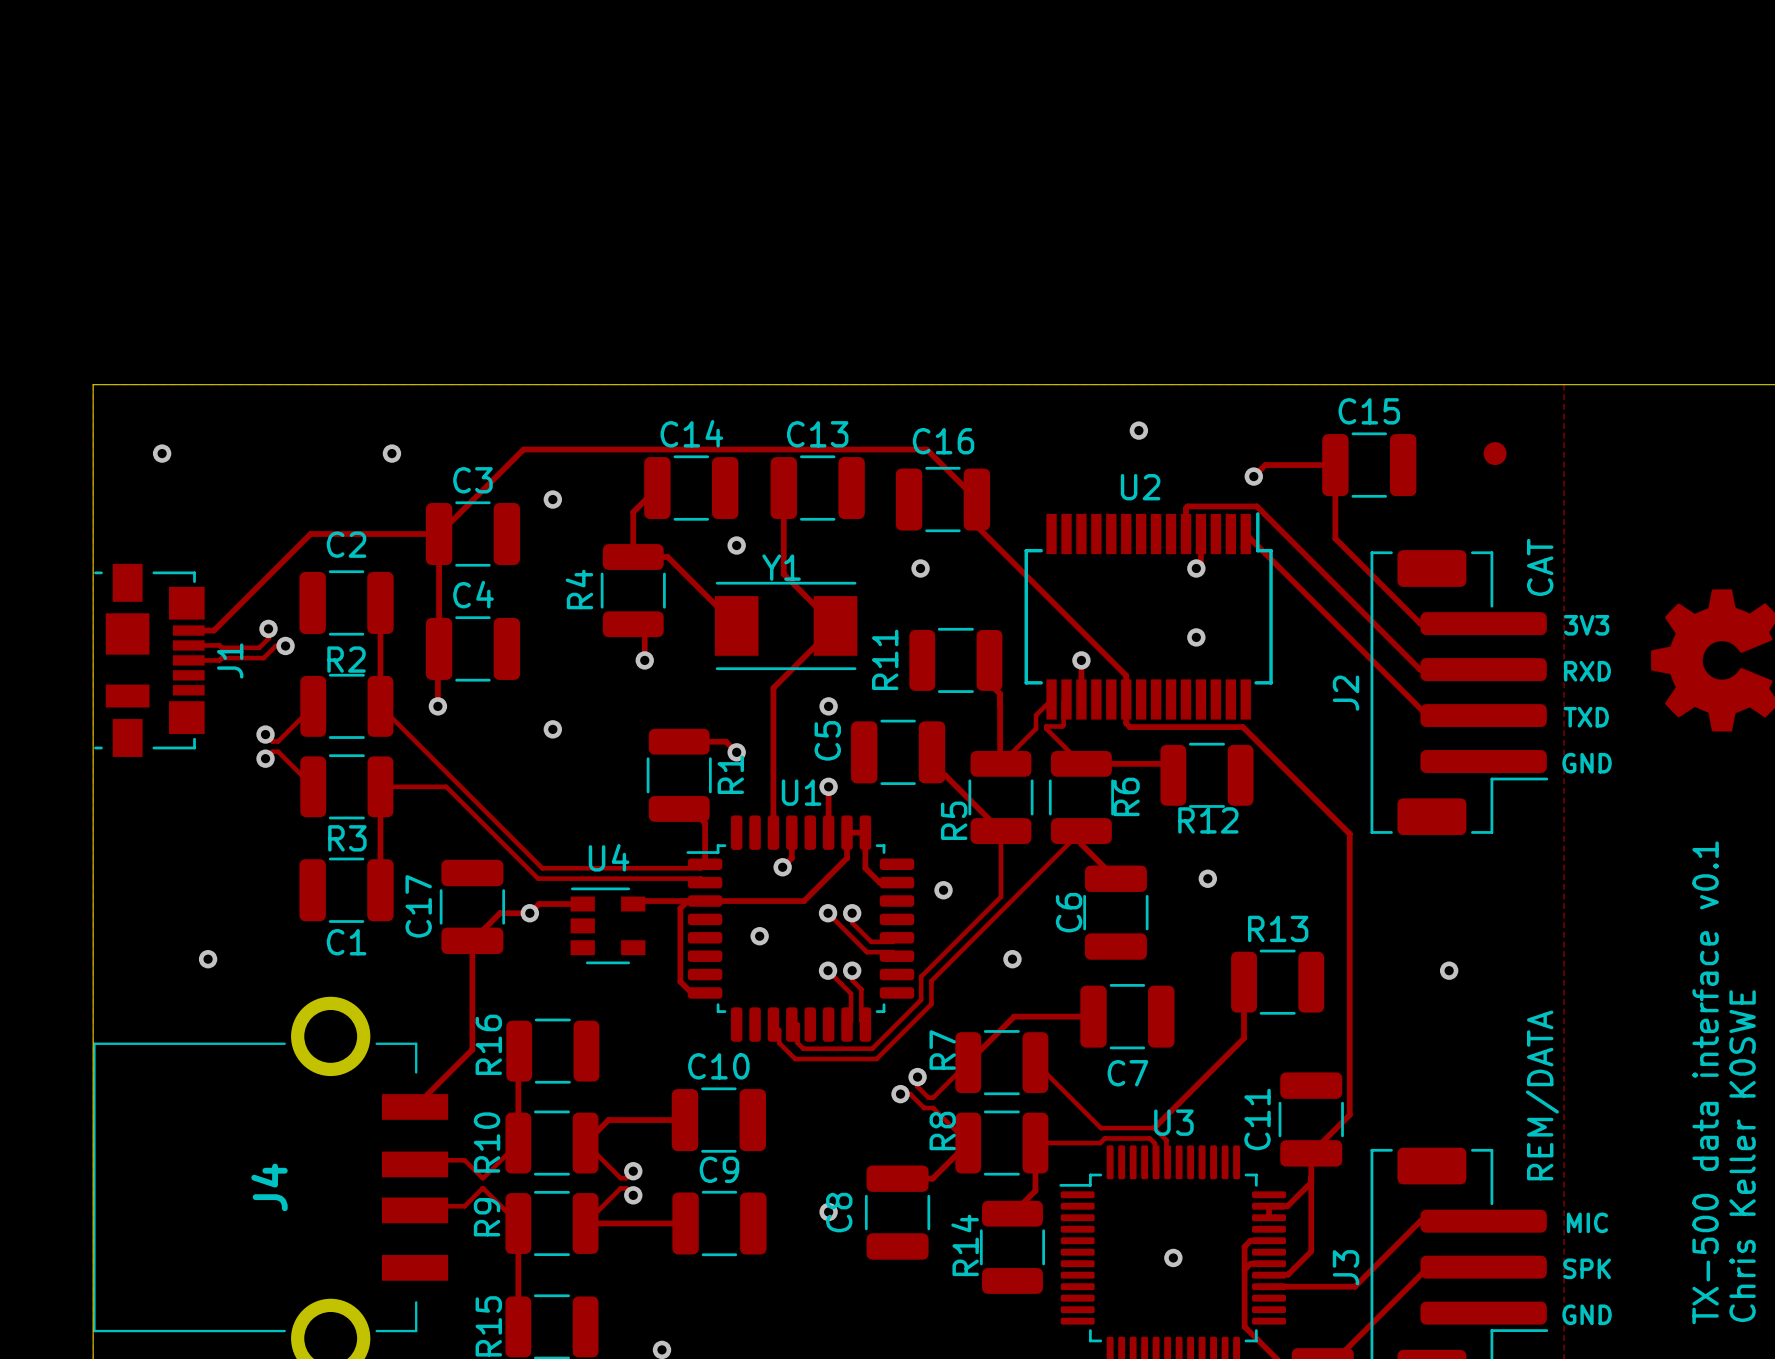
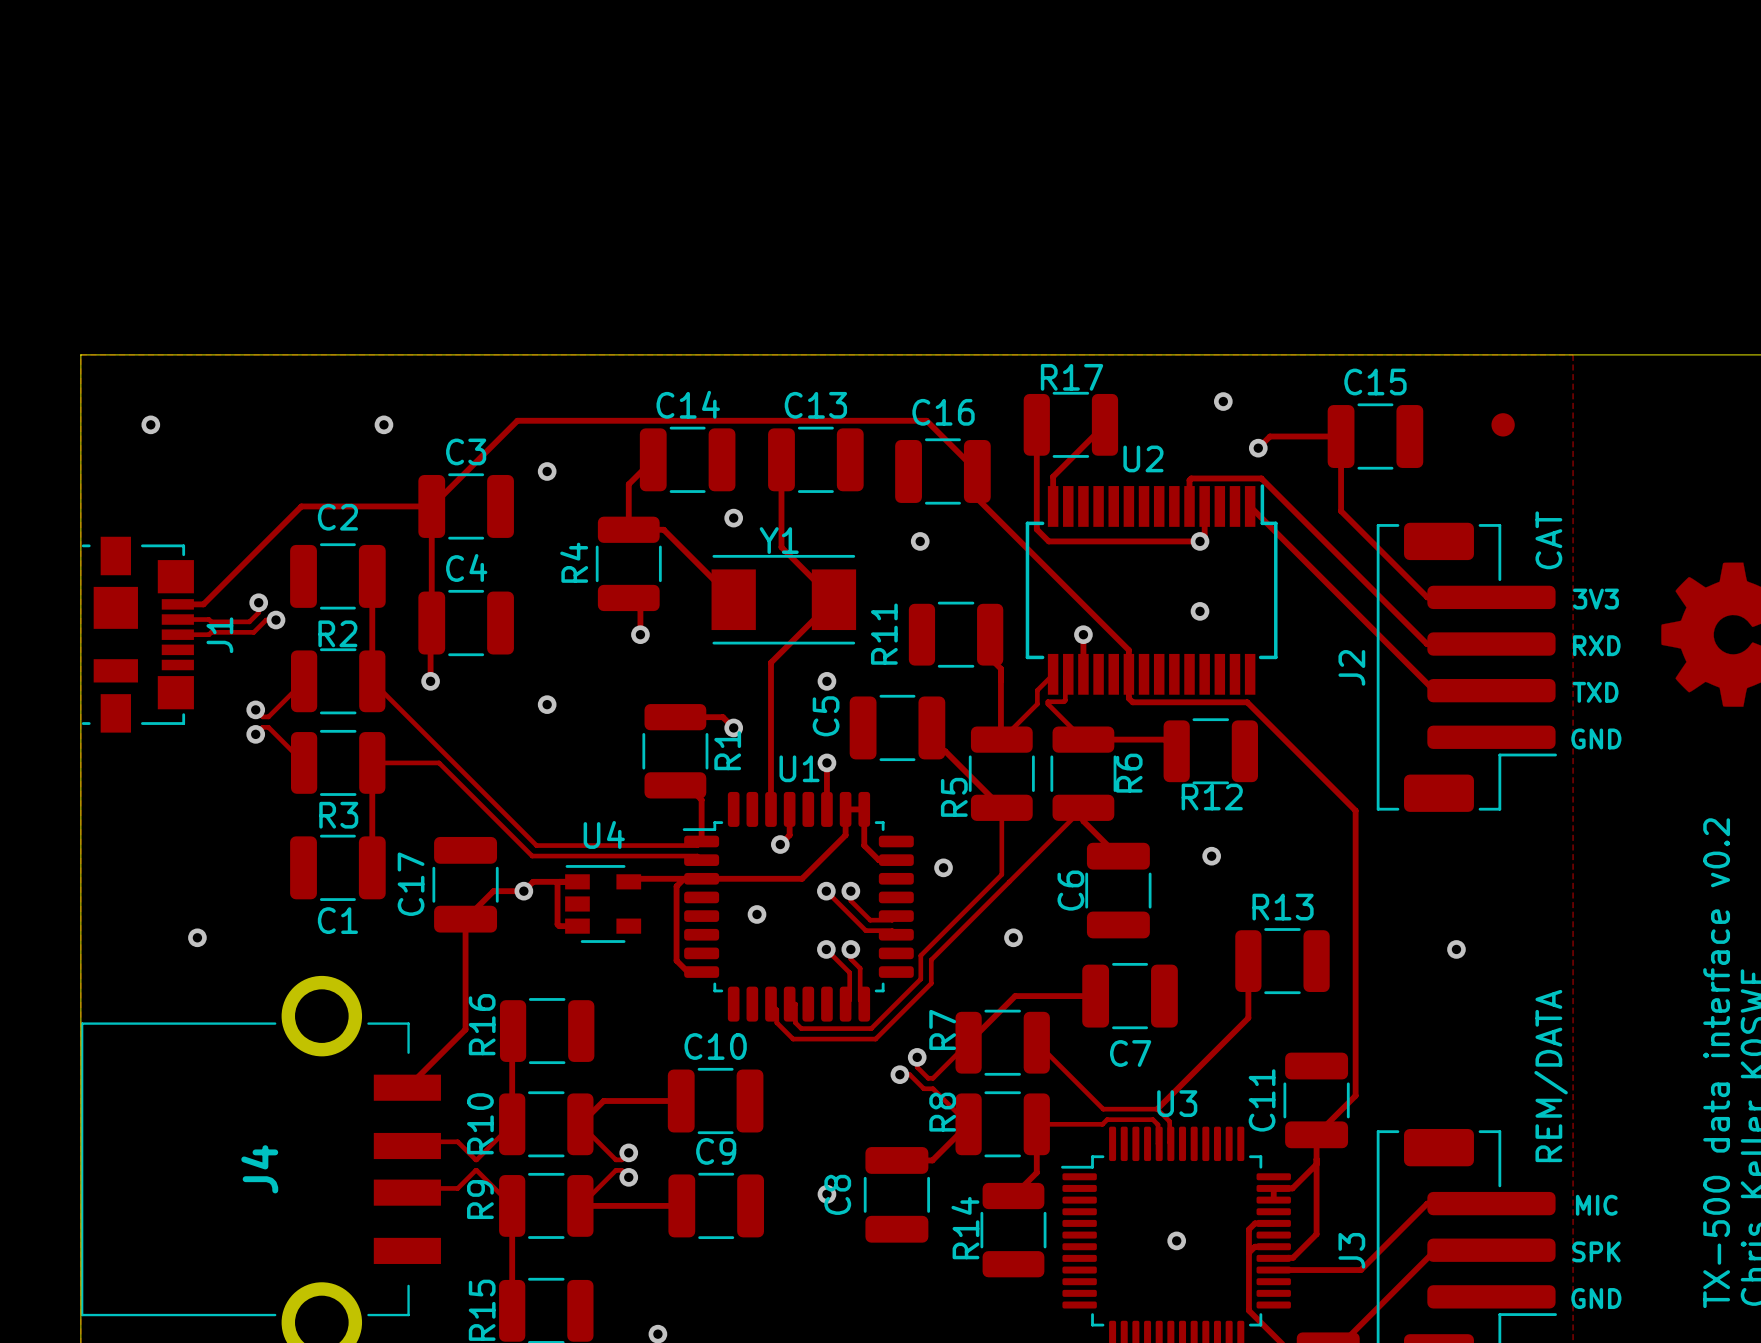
via position: (1138, 430) -> (1223, 401)
track: none -> (1036, 424) (1036, 529) (1048, 541) (1200, 541)
R17: none -> (1070, 424)
track: none -> (1104, 424) (1053, 476) (1053, 506)
track: none -> (559, 881) (557, 883) (557, 924) (559, 926) (577, 926)
text: TX-500 data interface v0.1 (1705, 1082) -> TX-500 data interface v0.2 (1716, 1063)

